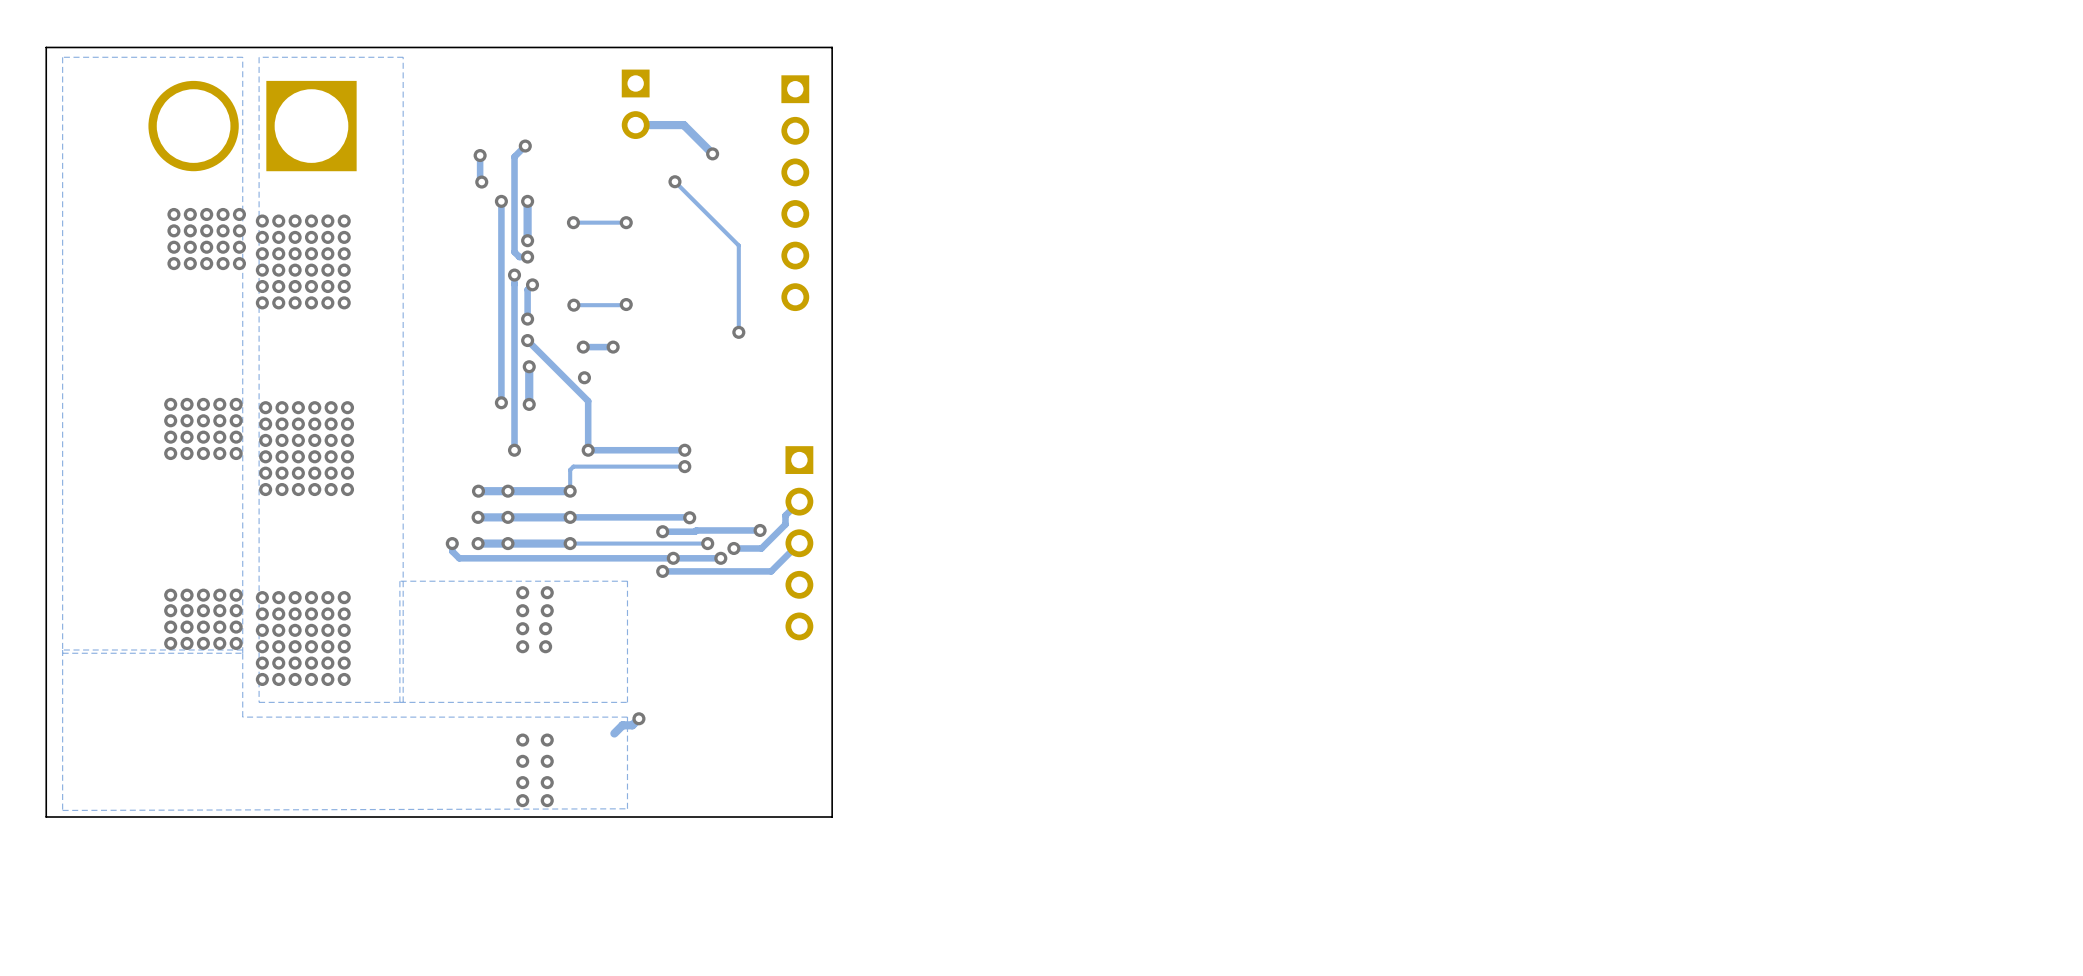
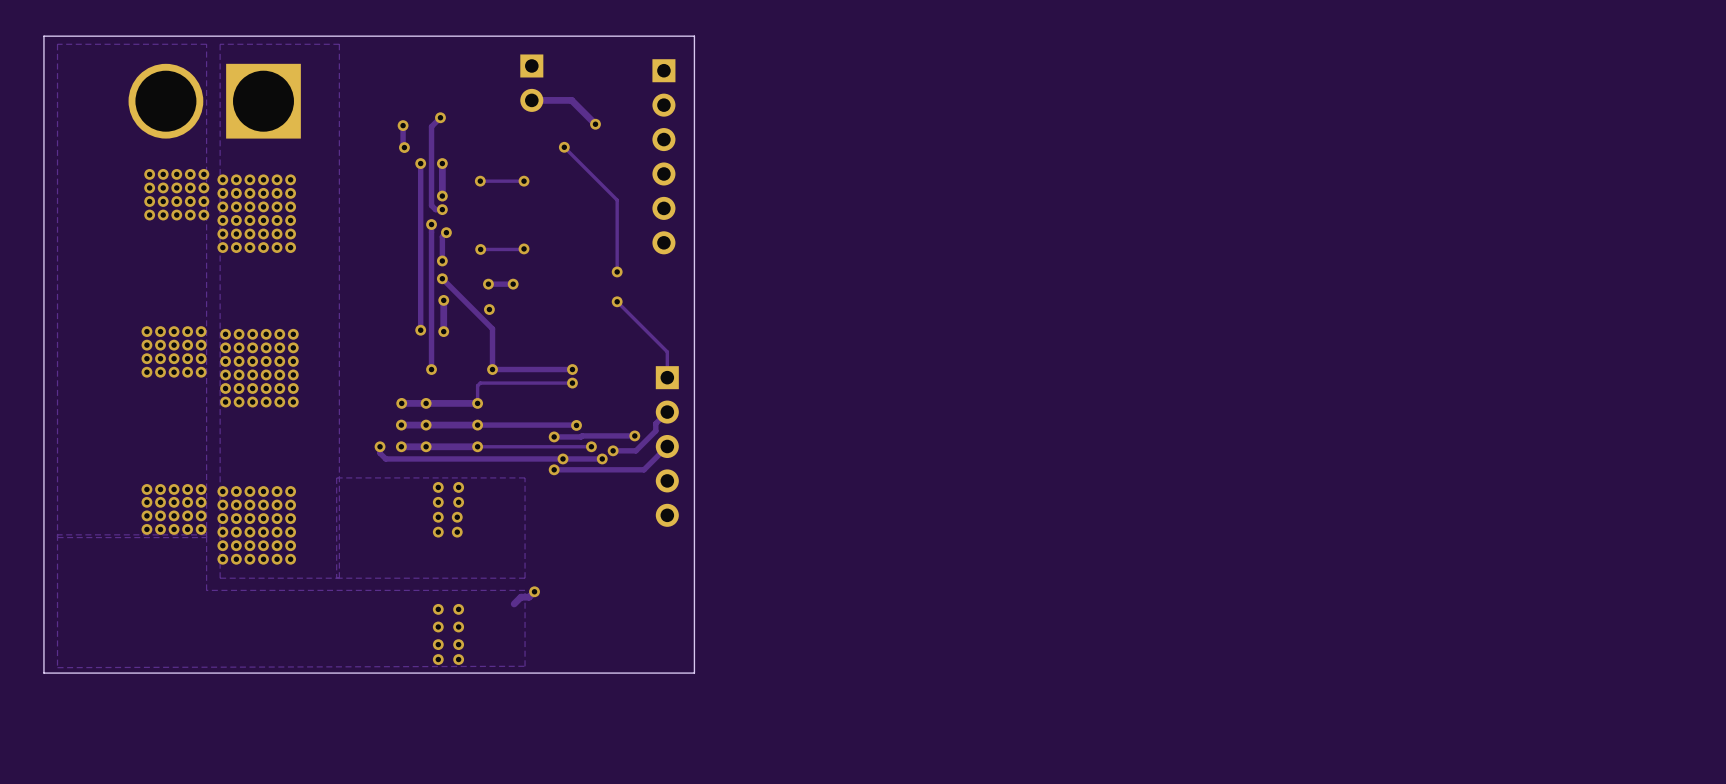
track: none -> (617, 301) (667, 351) (667, 377)
via: none -> (617, 301)

